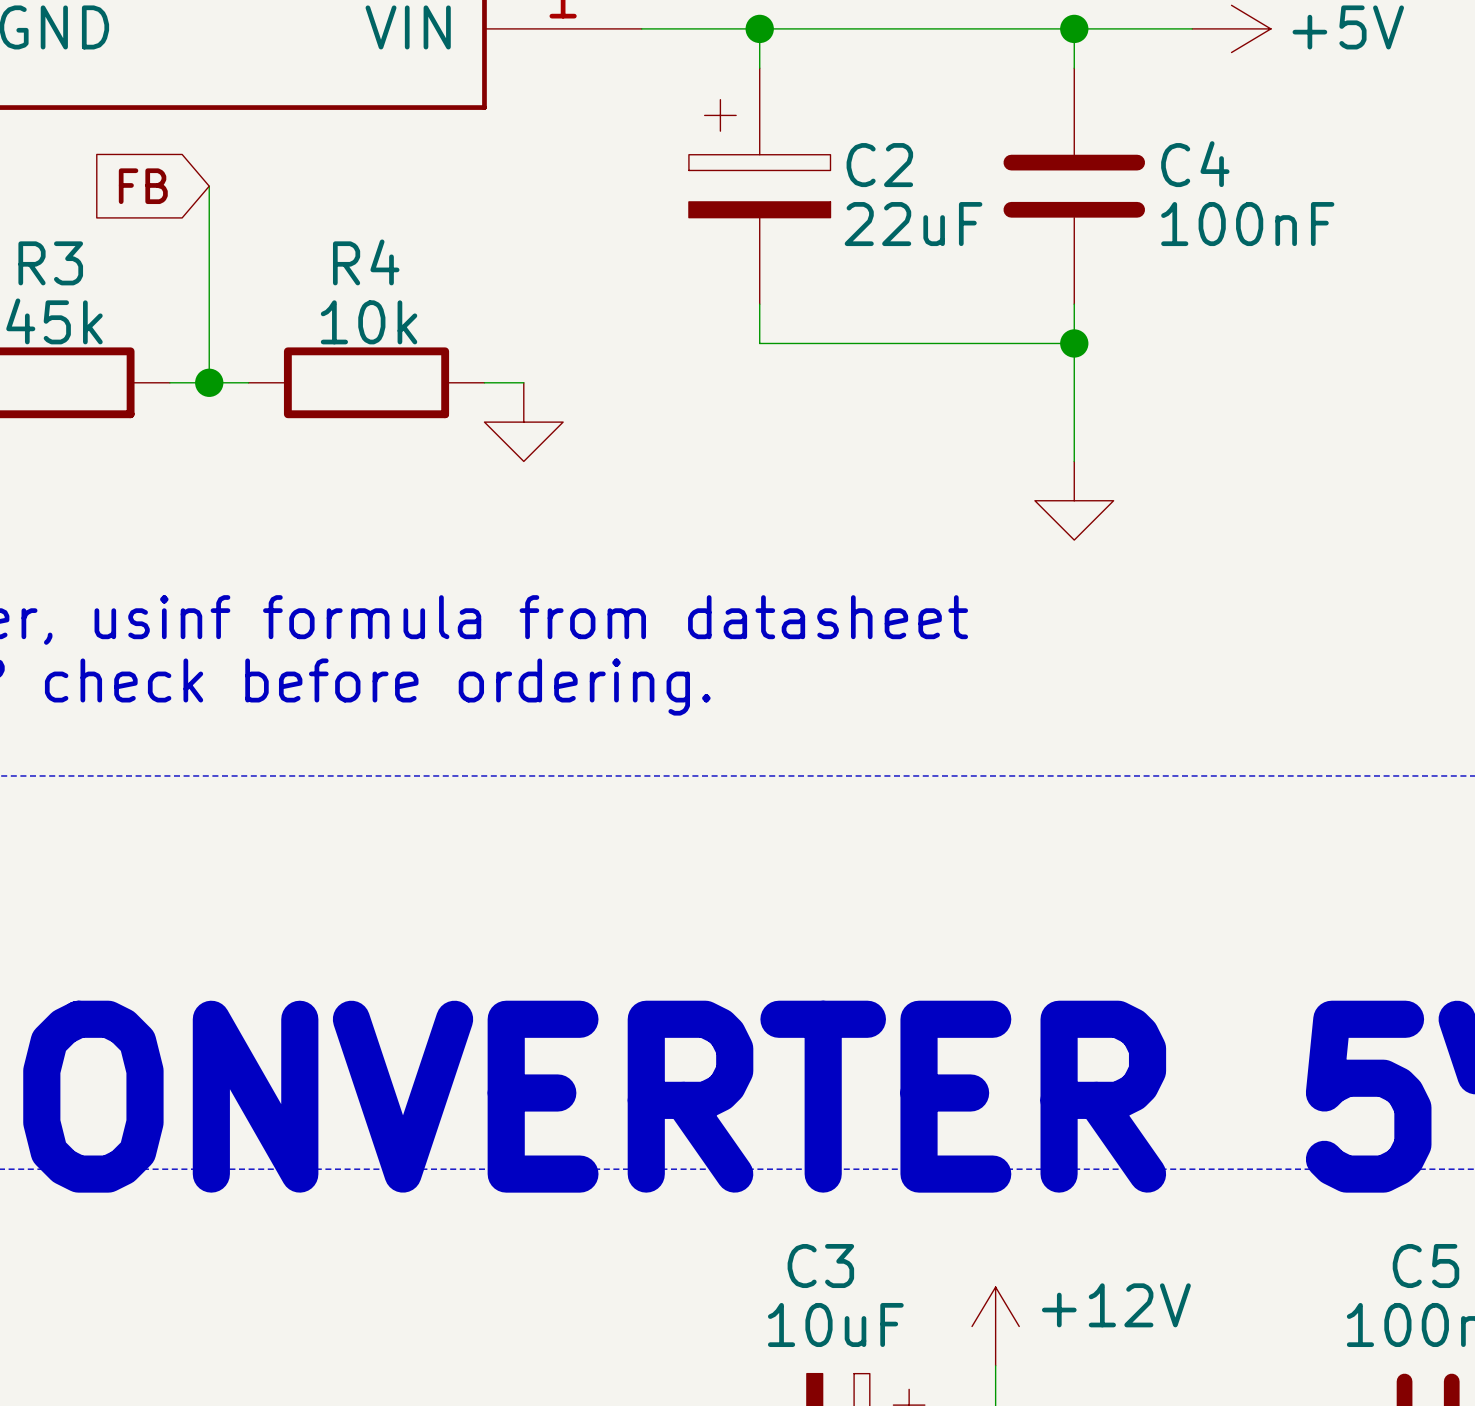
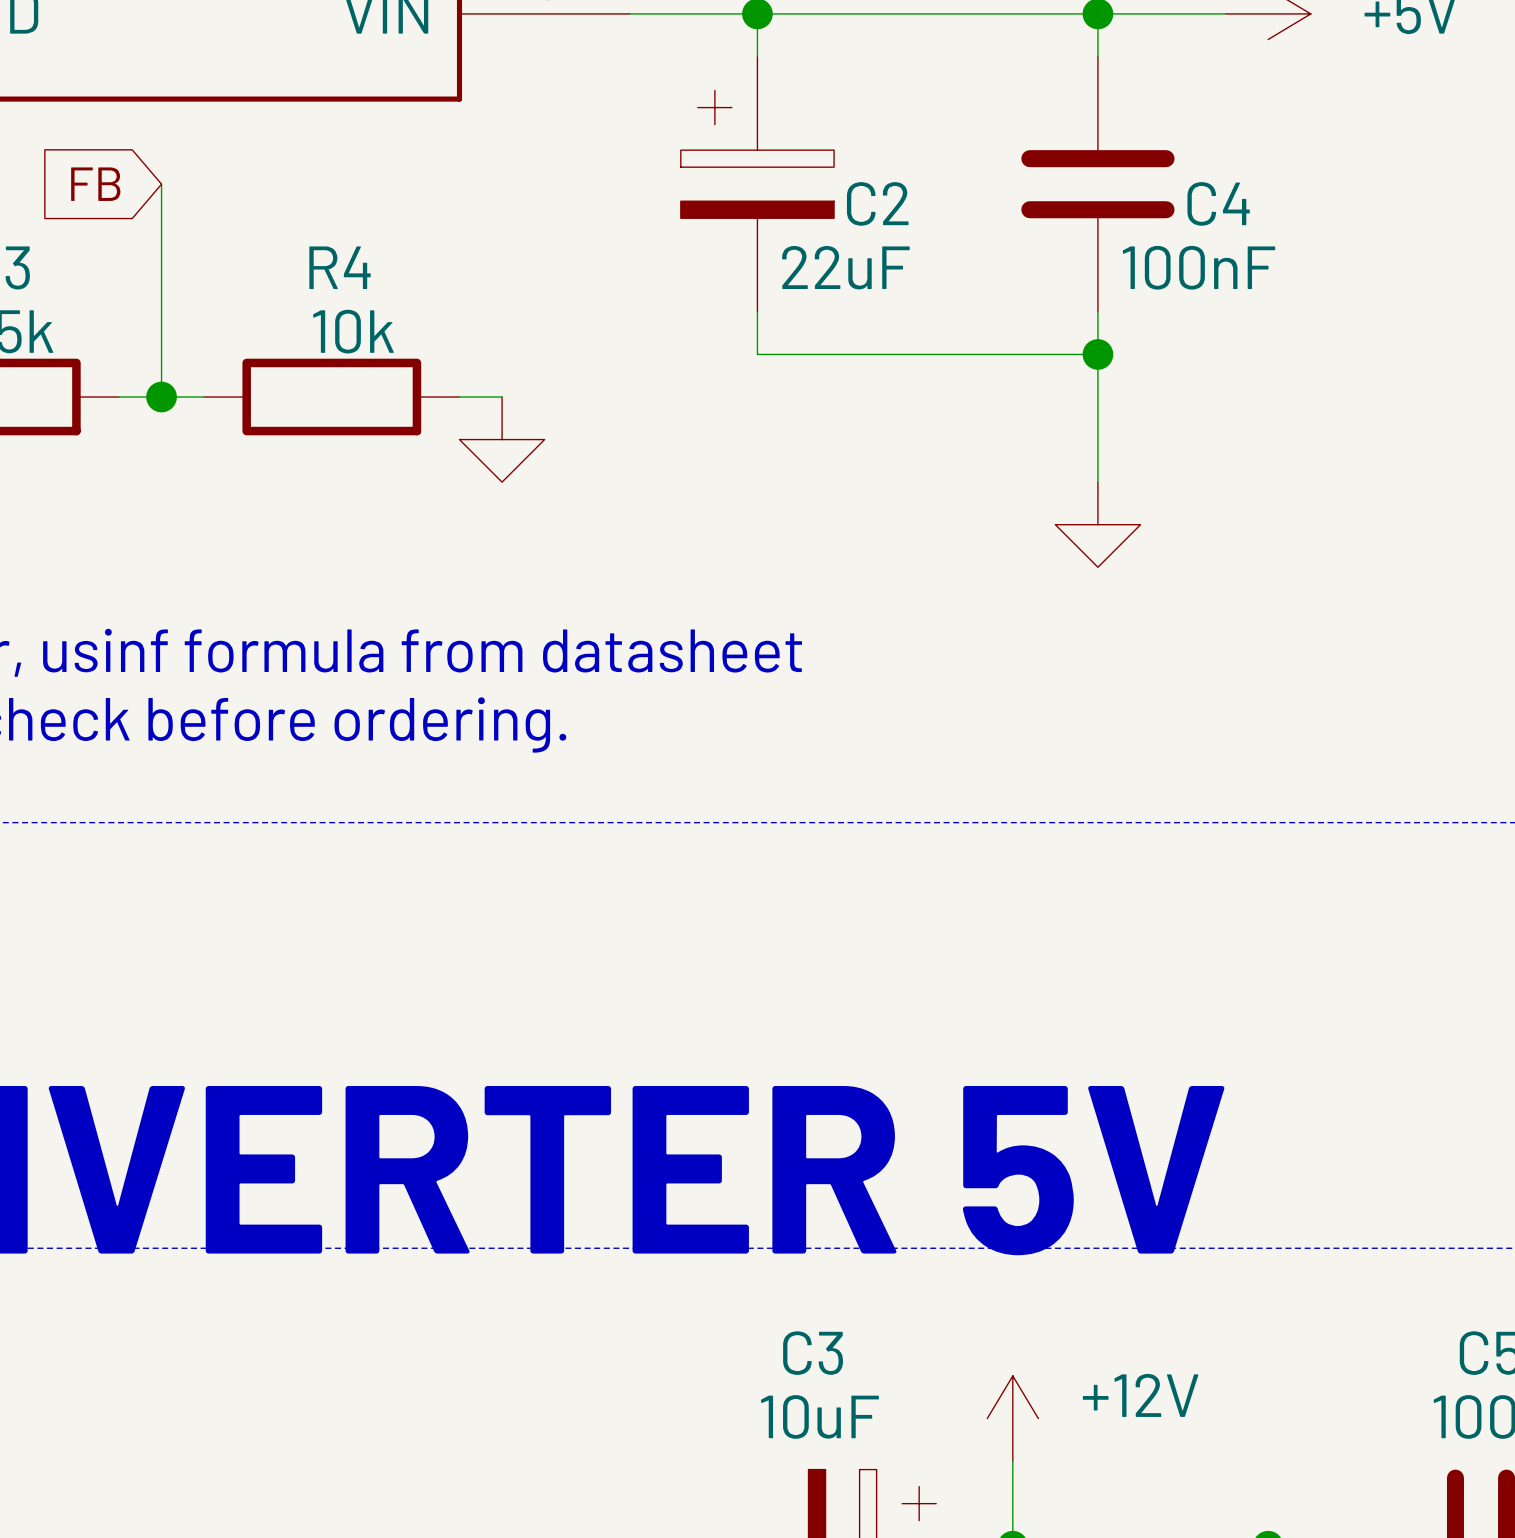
C4 name position: C4 (1195, 164) -> C4 (1218, 203)
C2 name position: C2 (879, 165) -> C2 (877, 203)
C2 value position: 22uF (913, 224) -> 22uF (845, 267)
C4 value position: 100nF (1247, 224) -> 100nF (1198, 267)

